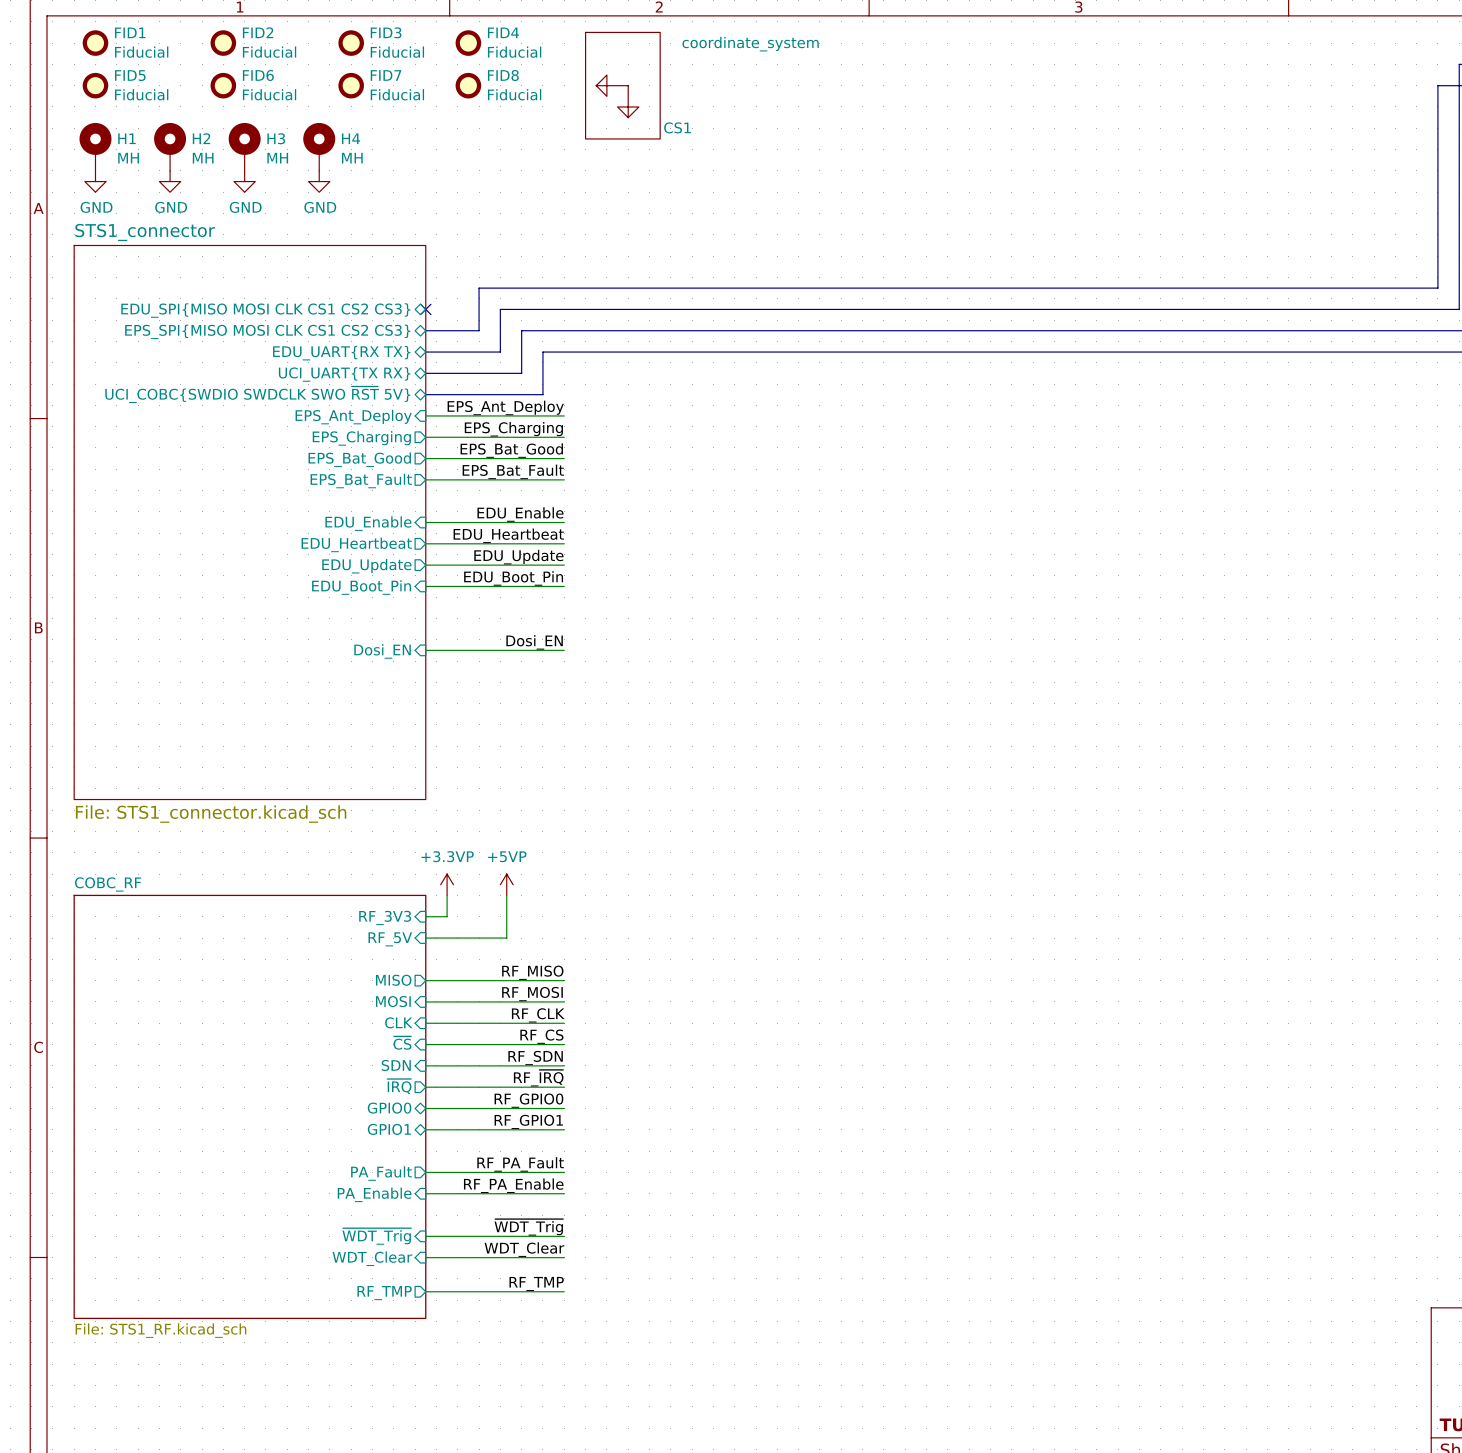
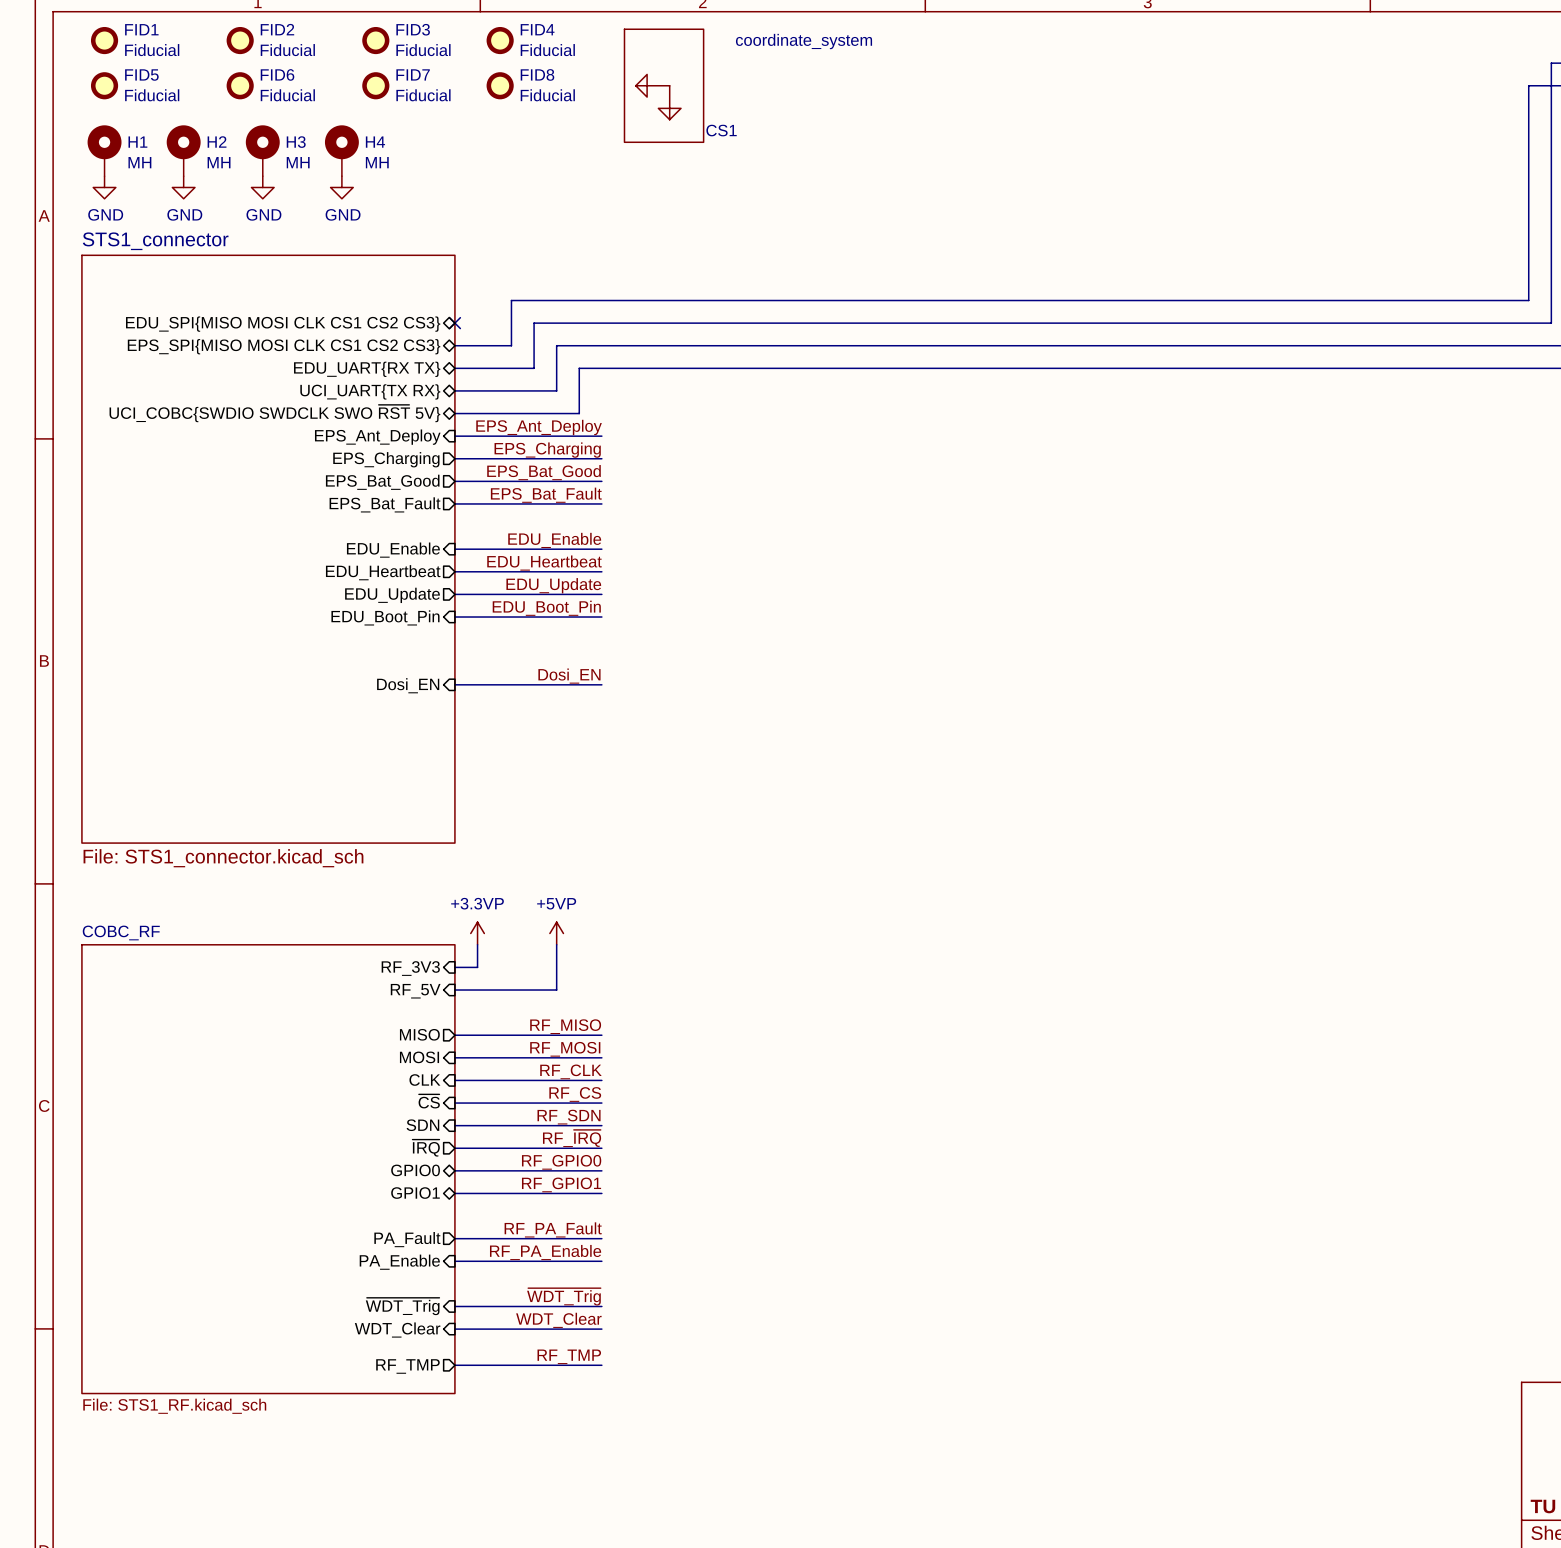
power symbol position: +5VP (506, 884) -> +5VP (556, 933)
wire: (506, 895) (506, 938) -> (556, 944) (556, 990) (540, 990)

